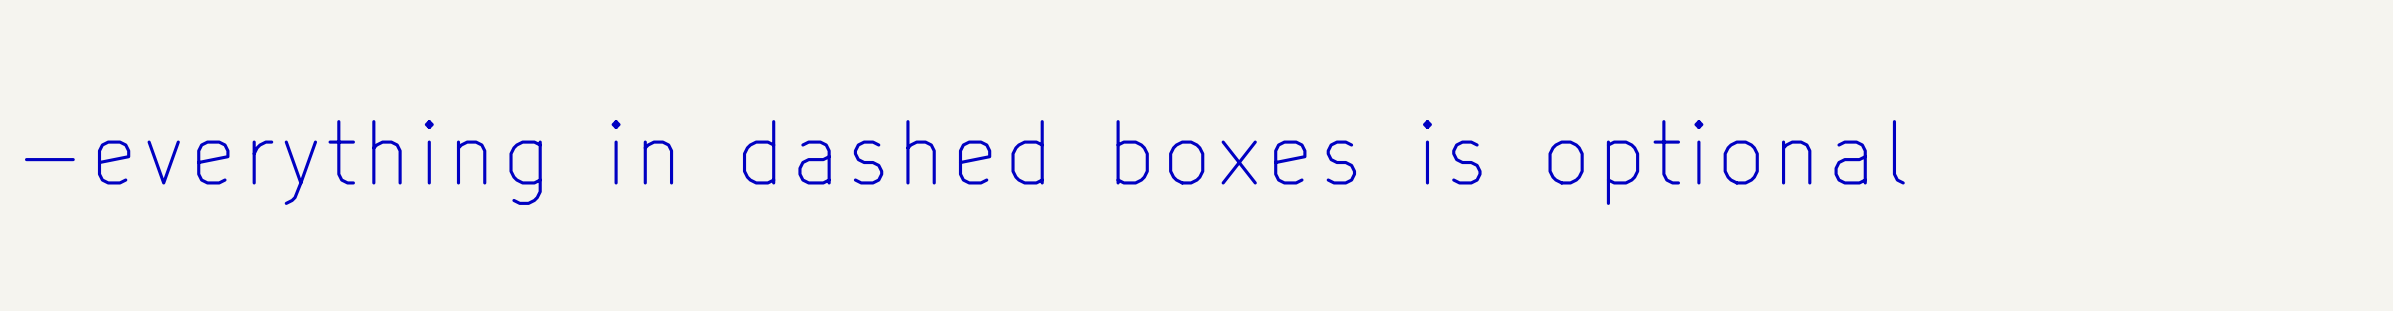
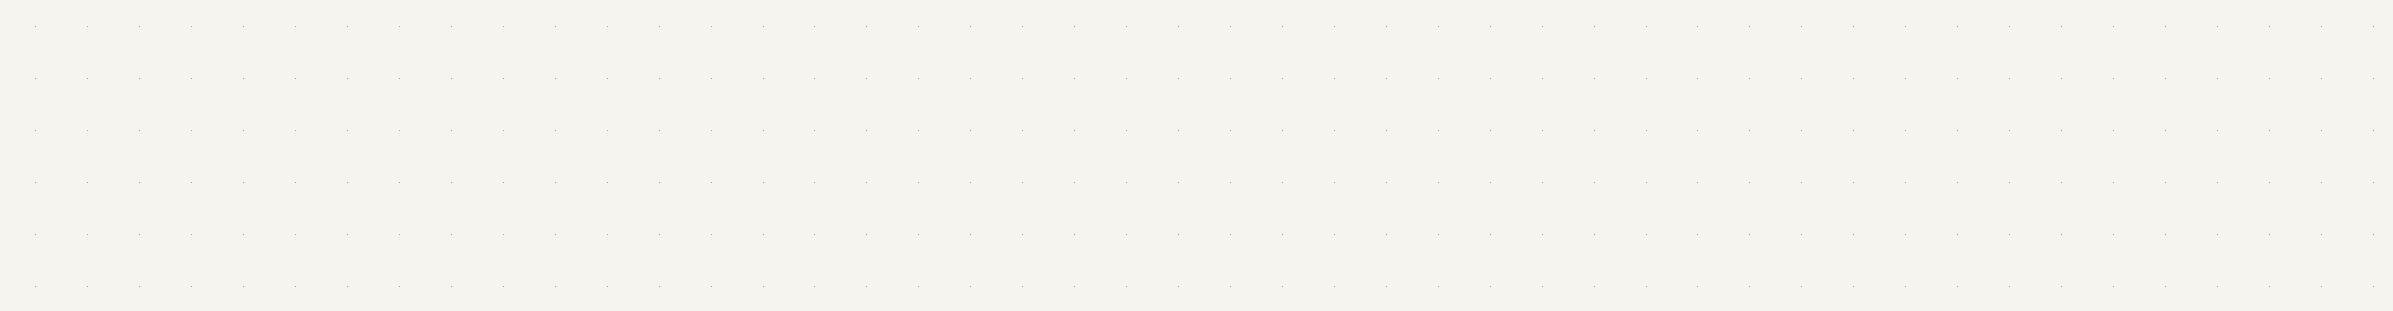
text: -everything in dashed boxes is optional (964, 162) -> none

